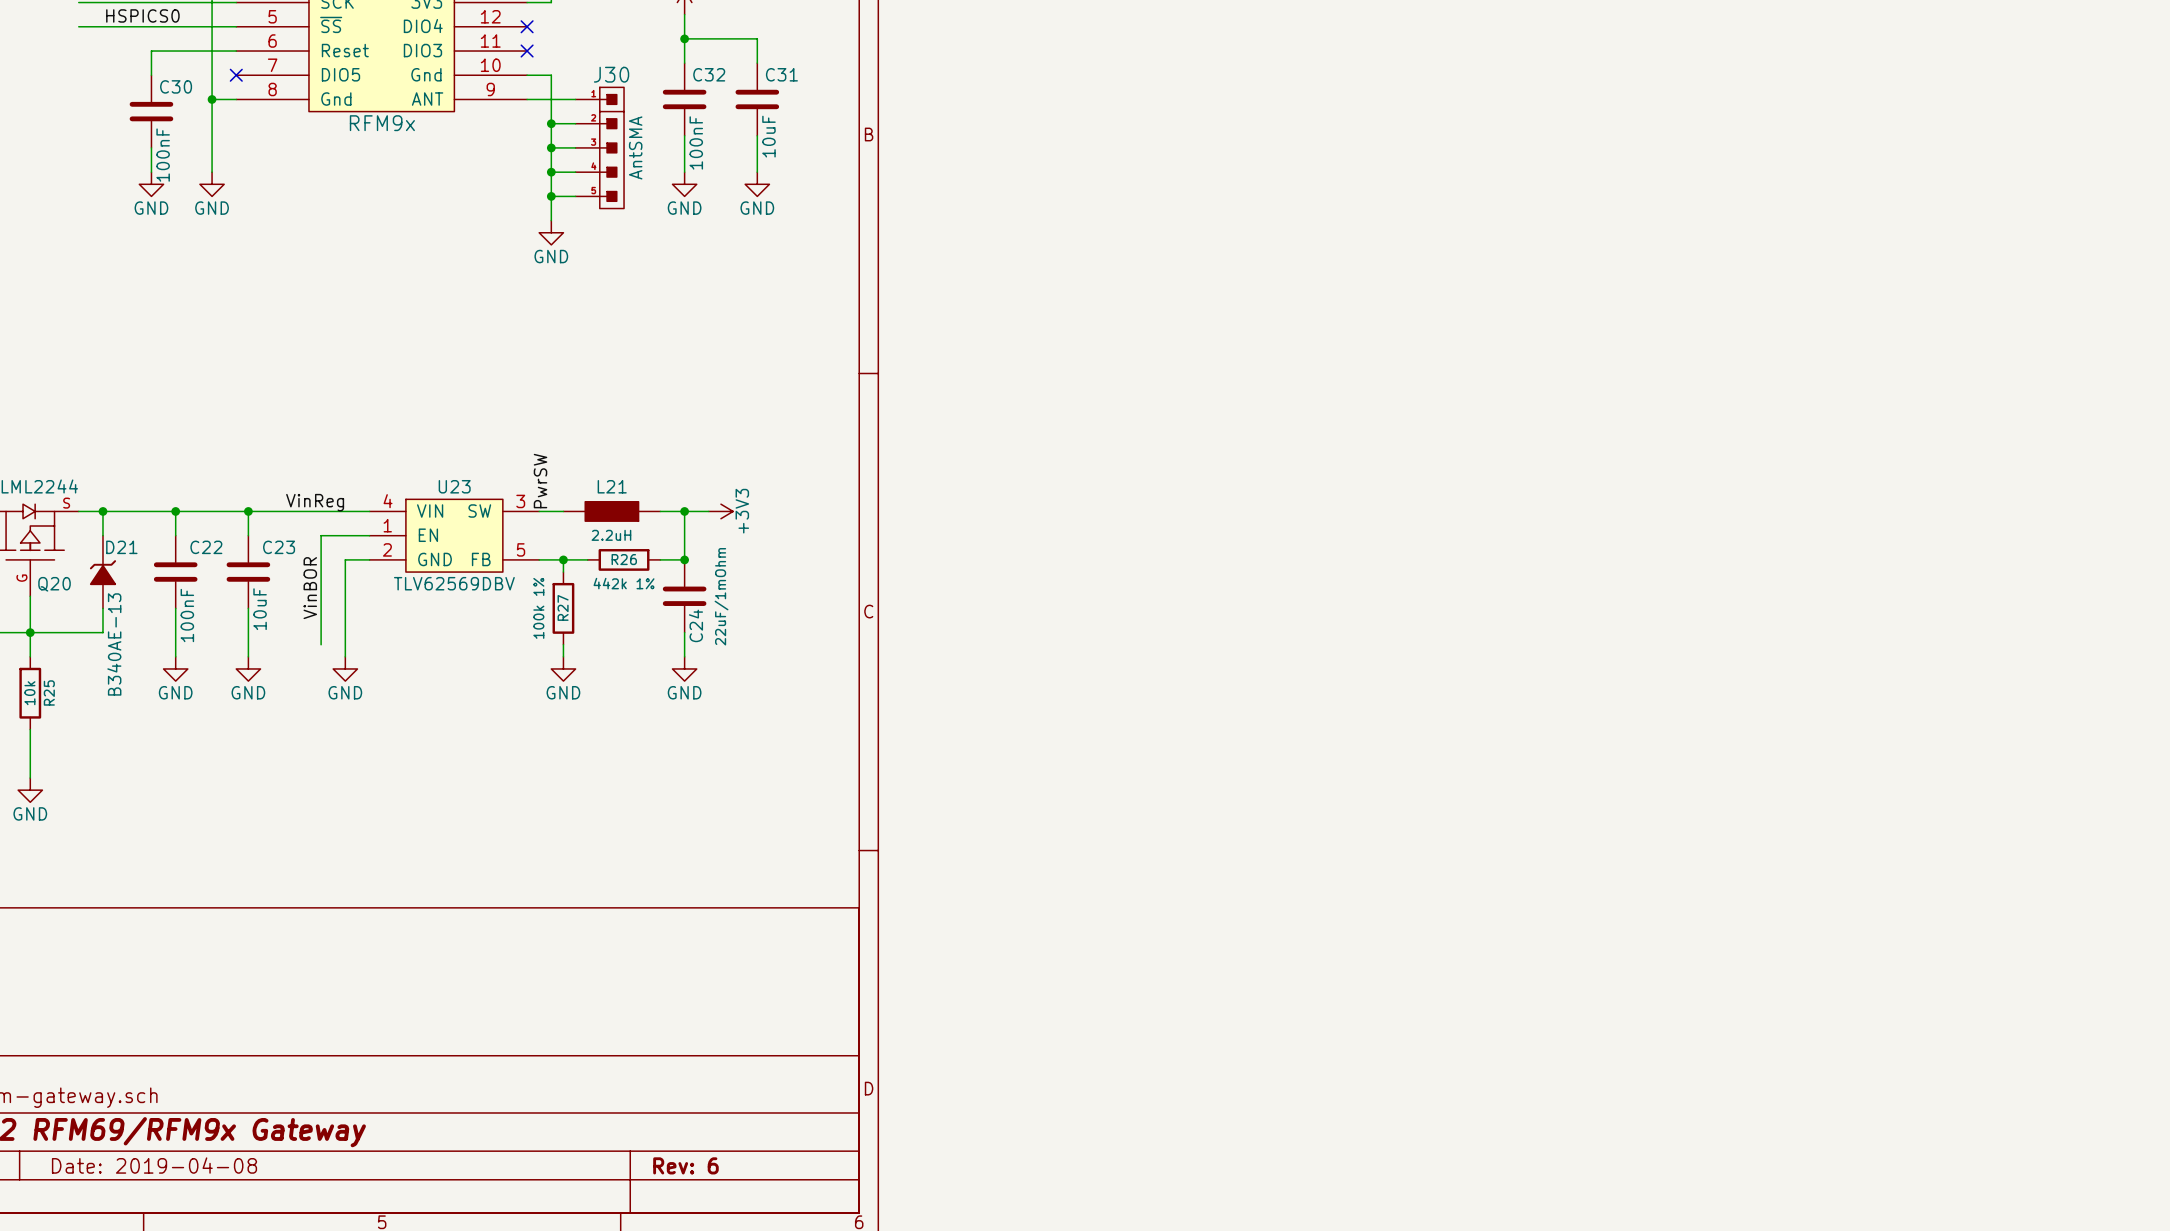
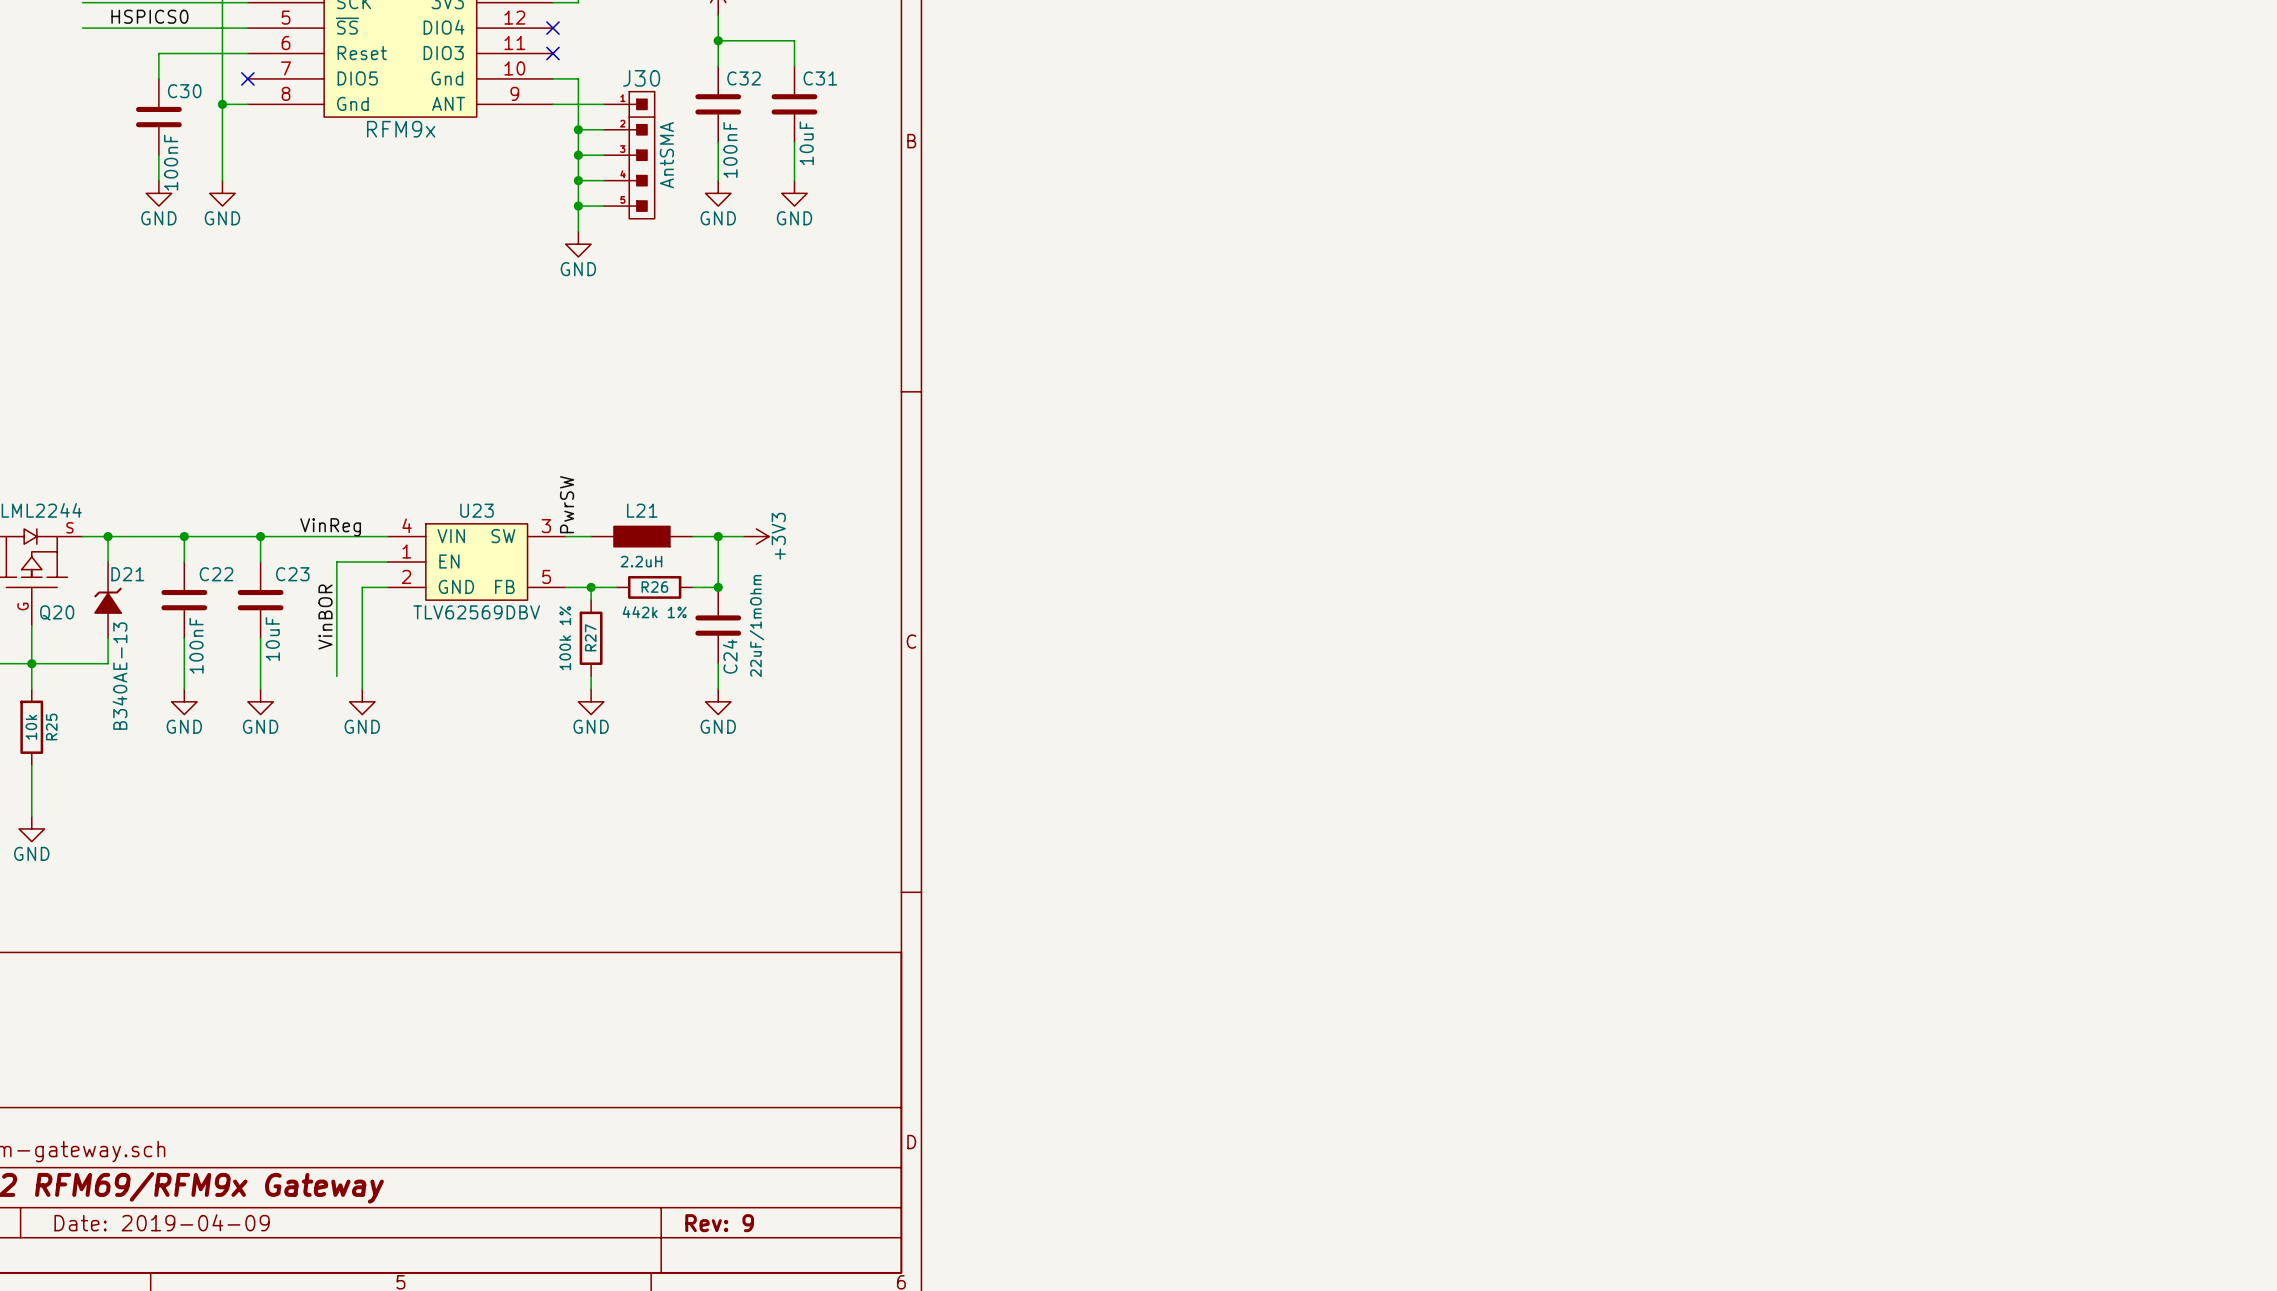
title block: Date: 2019-04-08 (154, 1165) -> Date: 2019-04-09 (162, 1222)
title block: Rev: 6 (685, 1165) -> Rev: 9 (719, 1223)

